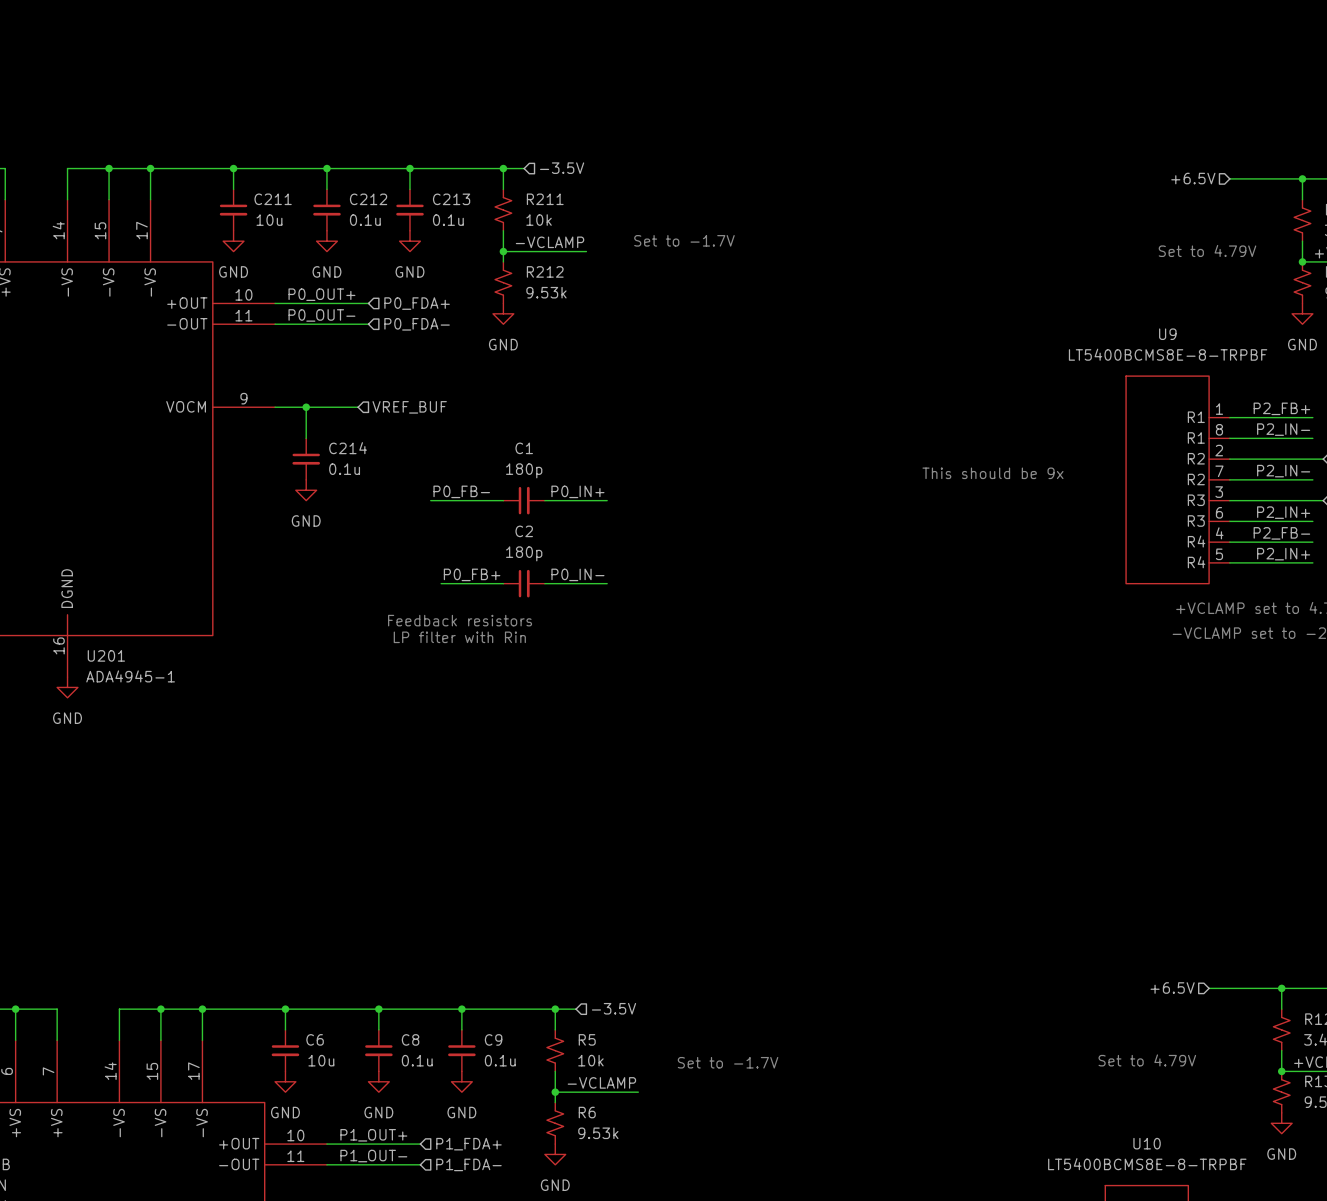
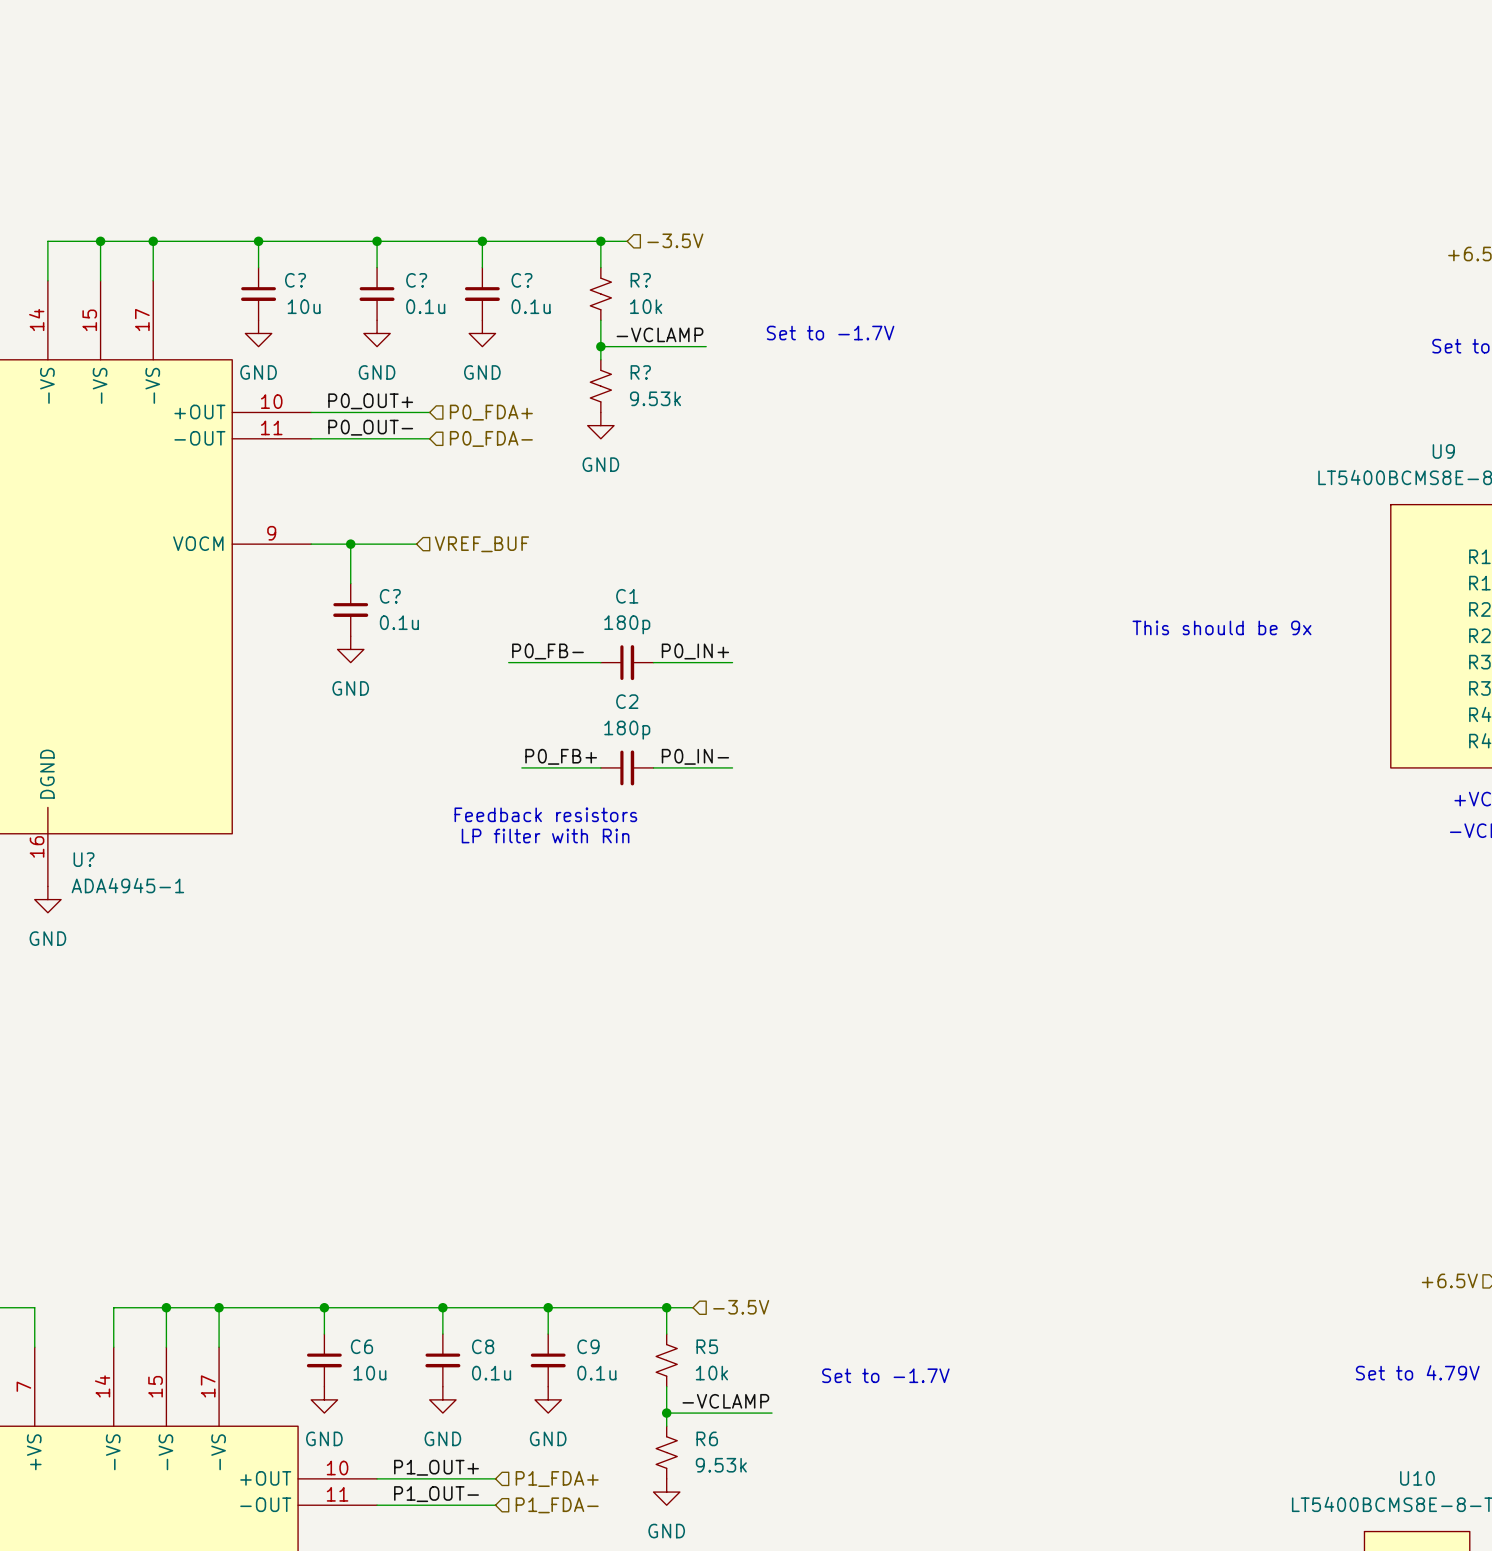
C211 name: C211 (273, 199) -> C? (295, 280)
C212 name: C212 (368, 199) -> C? (416, 280)
C213 name: C213 (451, 199) -> C? (521, 280)
R211 name: R211 (545, 199) -> R? (640, 280)
R212 name: R212 (545, 271) -> R? (640, 372)
C214 name: C214 (348, 448) -> C? (390, 596)
U201 name: U201 (106, 655) -> U? (84, 859)

